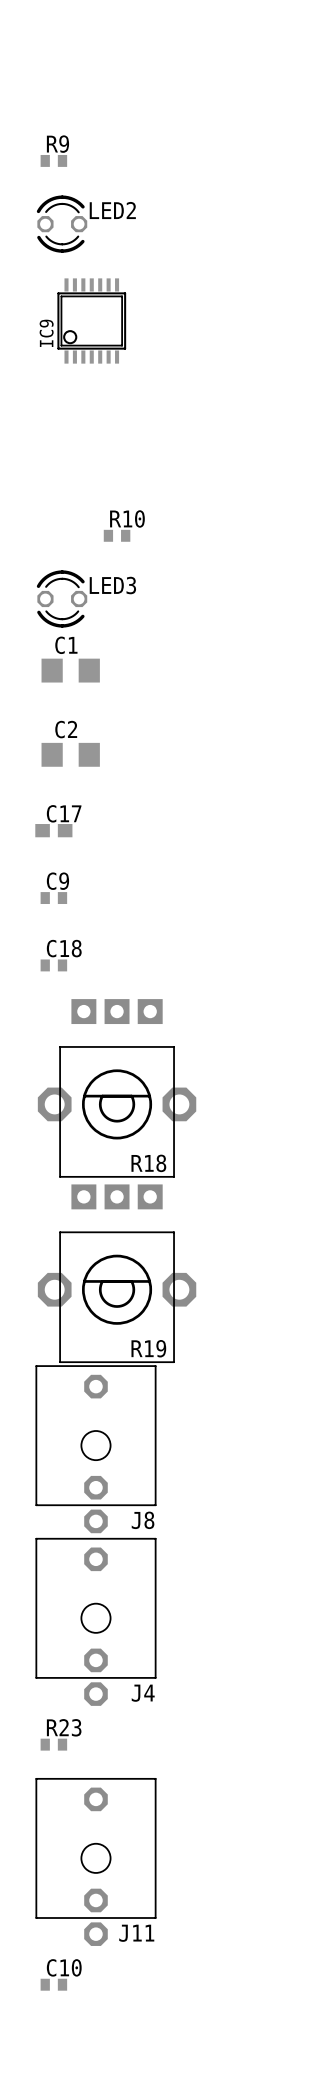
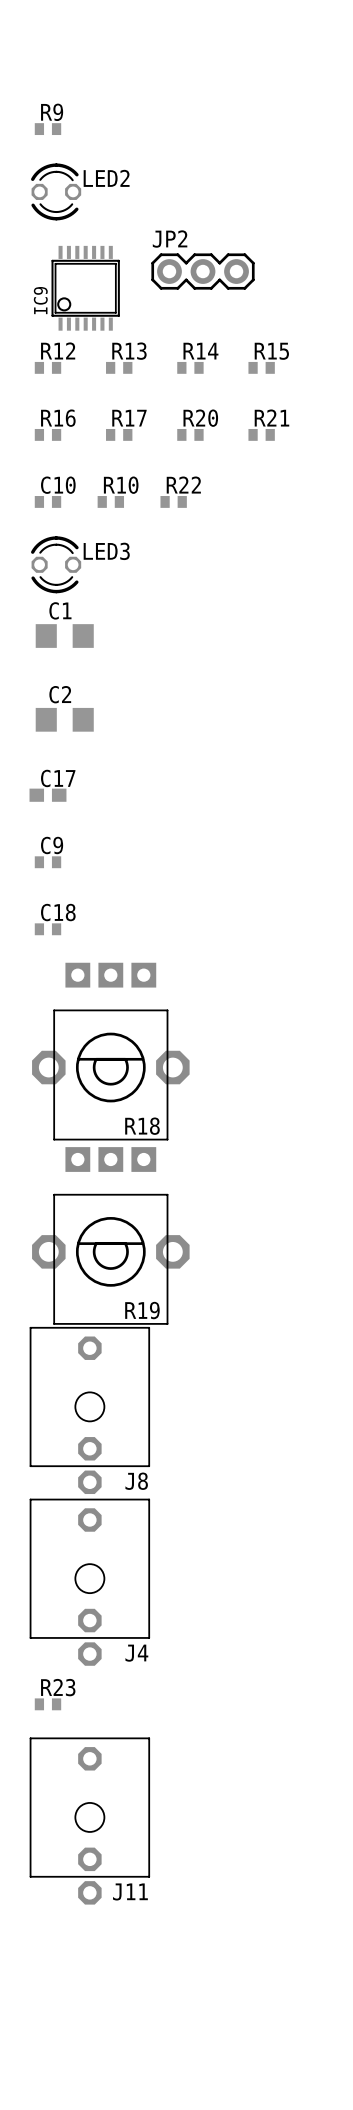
JP2: none -> (202, 271)
R12: none -> (47, 367)
R13: none -> (119, 367)
R14: none -> (190, 367)
R15: none -> (261, 367)
R16: none -> (47, 434)
R17: none -> (119, 434)
R20: none -> (190, 434)
R21: none -> (261, 434)
R22: none -> (173, 501)
C10 position: (53, 1984) -> (47, 501)

